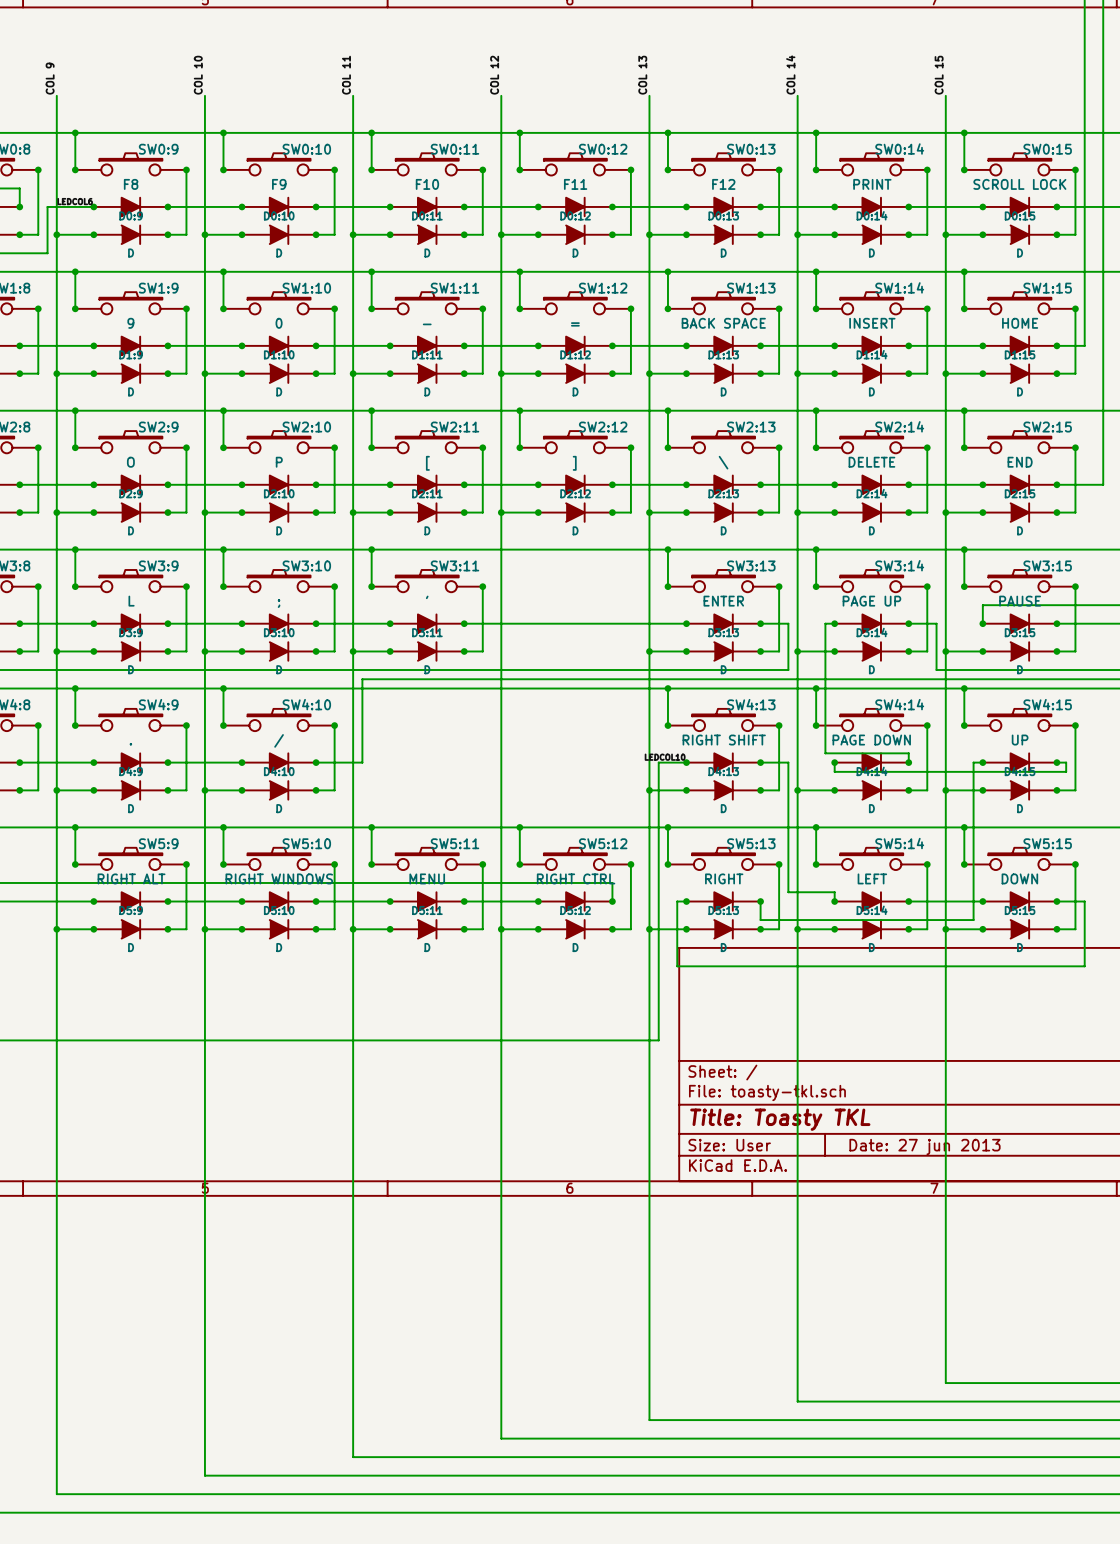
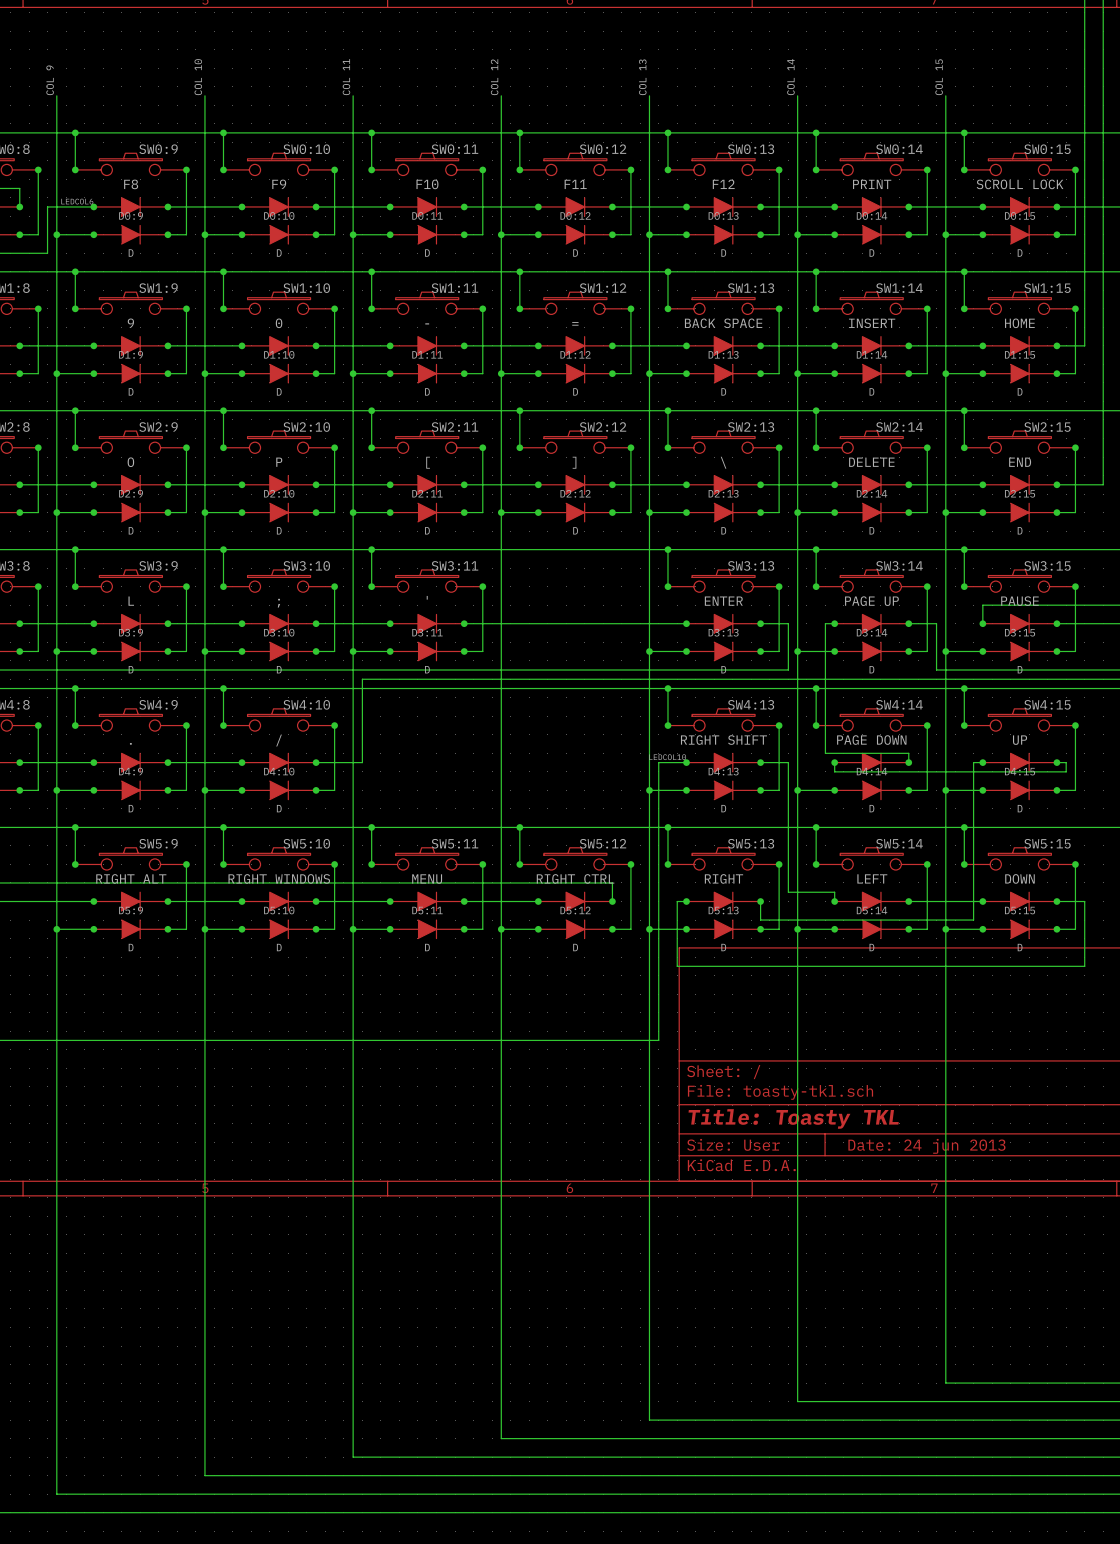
title block: Date: 27 jun 2013 (924, 1146) -> Date: 24 jun 2013 (926, 1146)

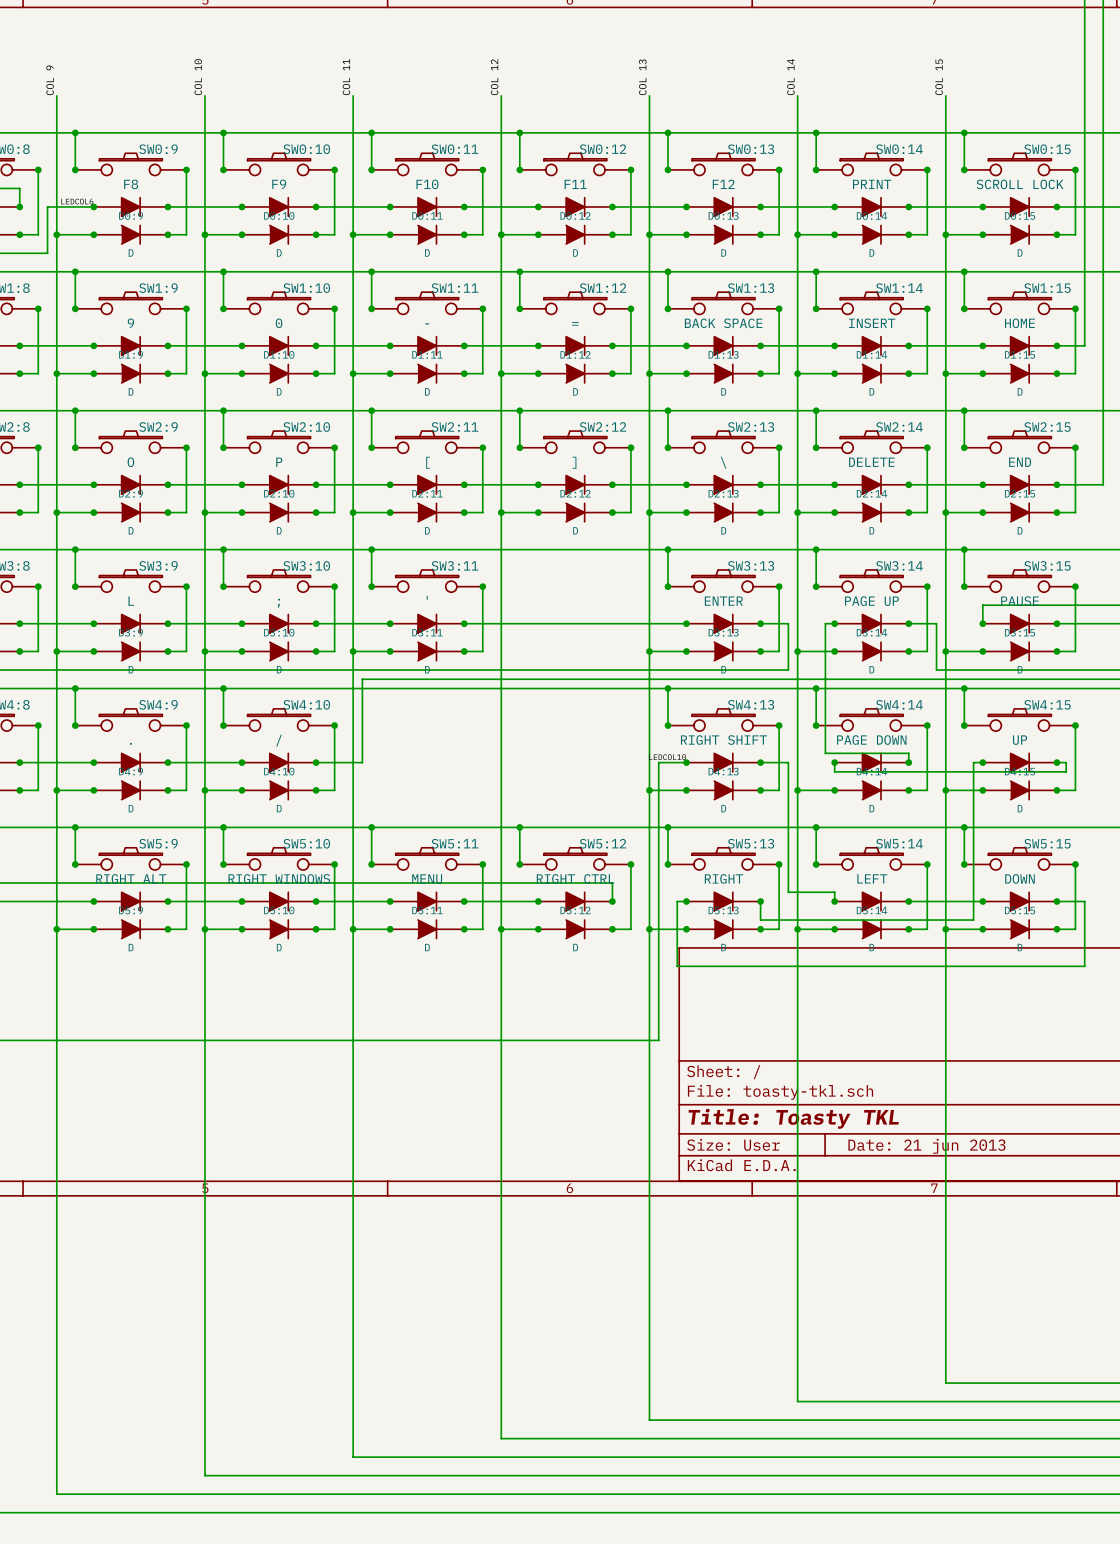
title block: Date: 24 jun 2013 (926, 1146) -> Date: 21 jun 2013 (926, 1146)

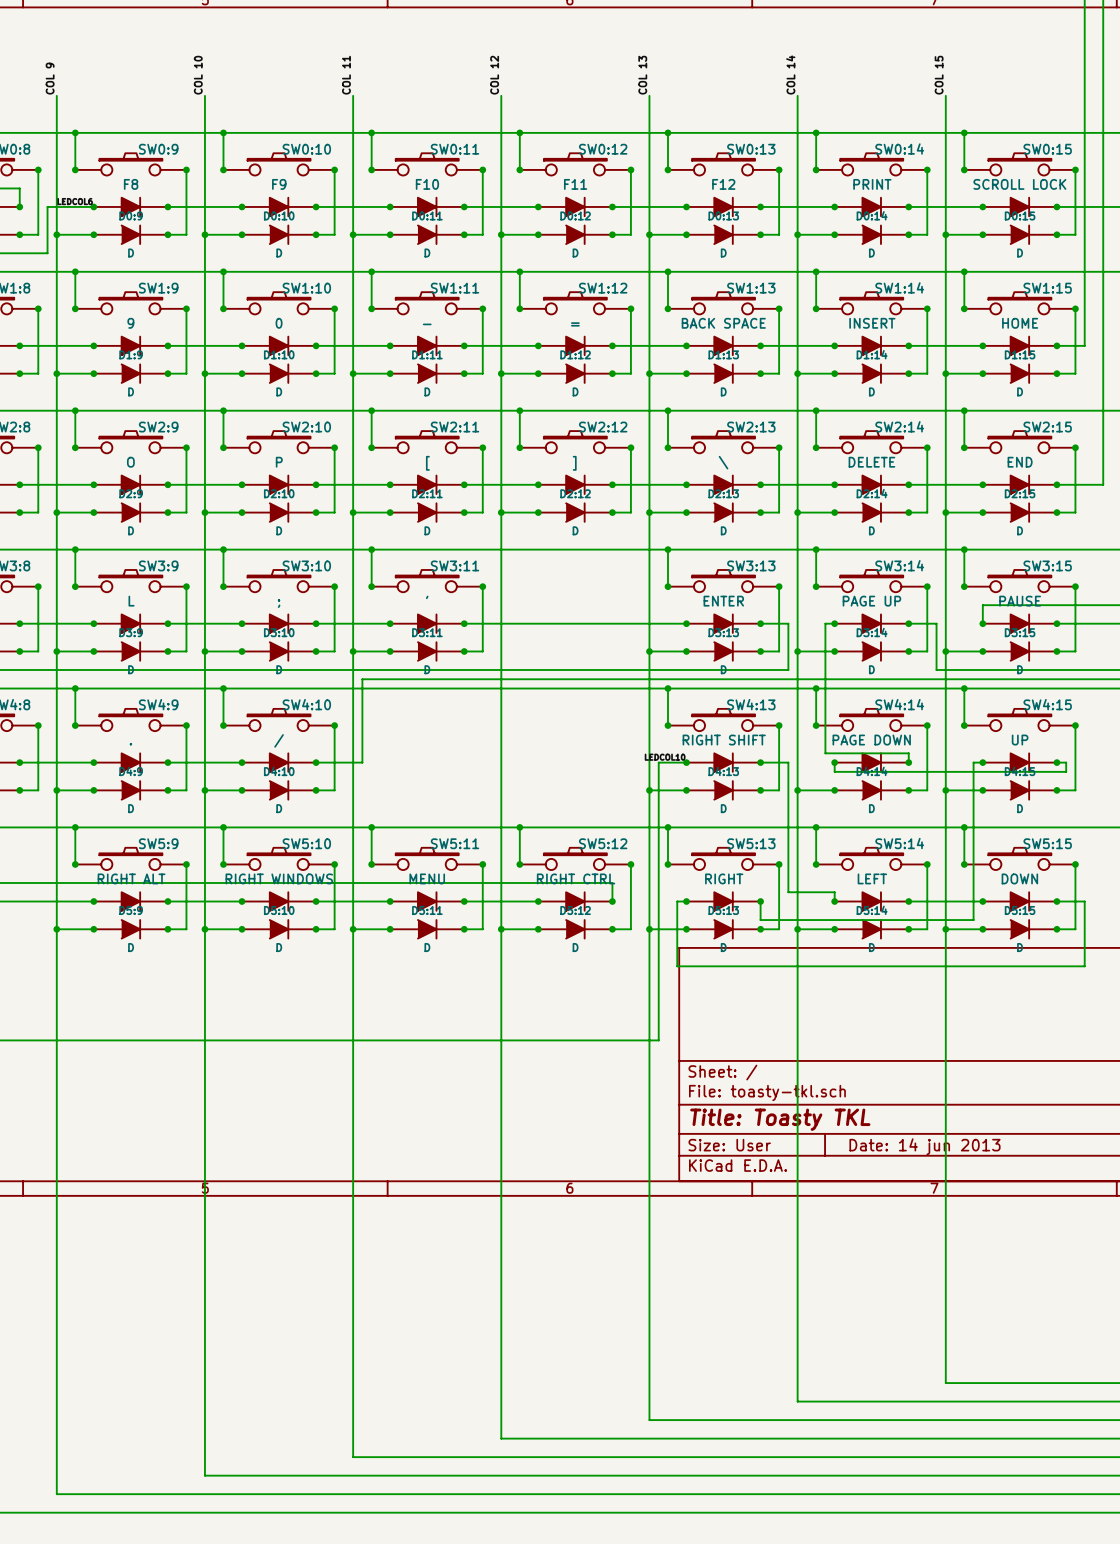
title block: Date: 21 jun 2013 (926, 1146) -> Date: 14 jun 2013 (924, 1146)

